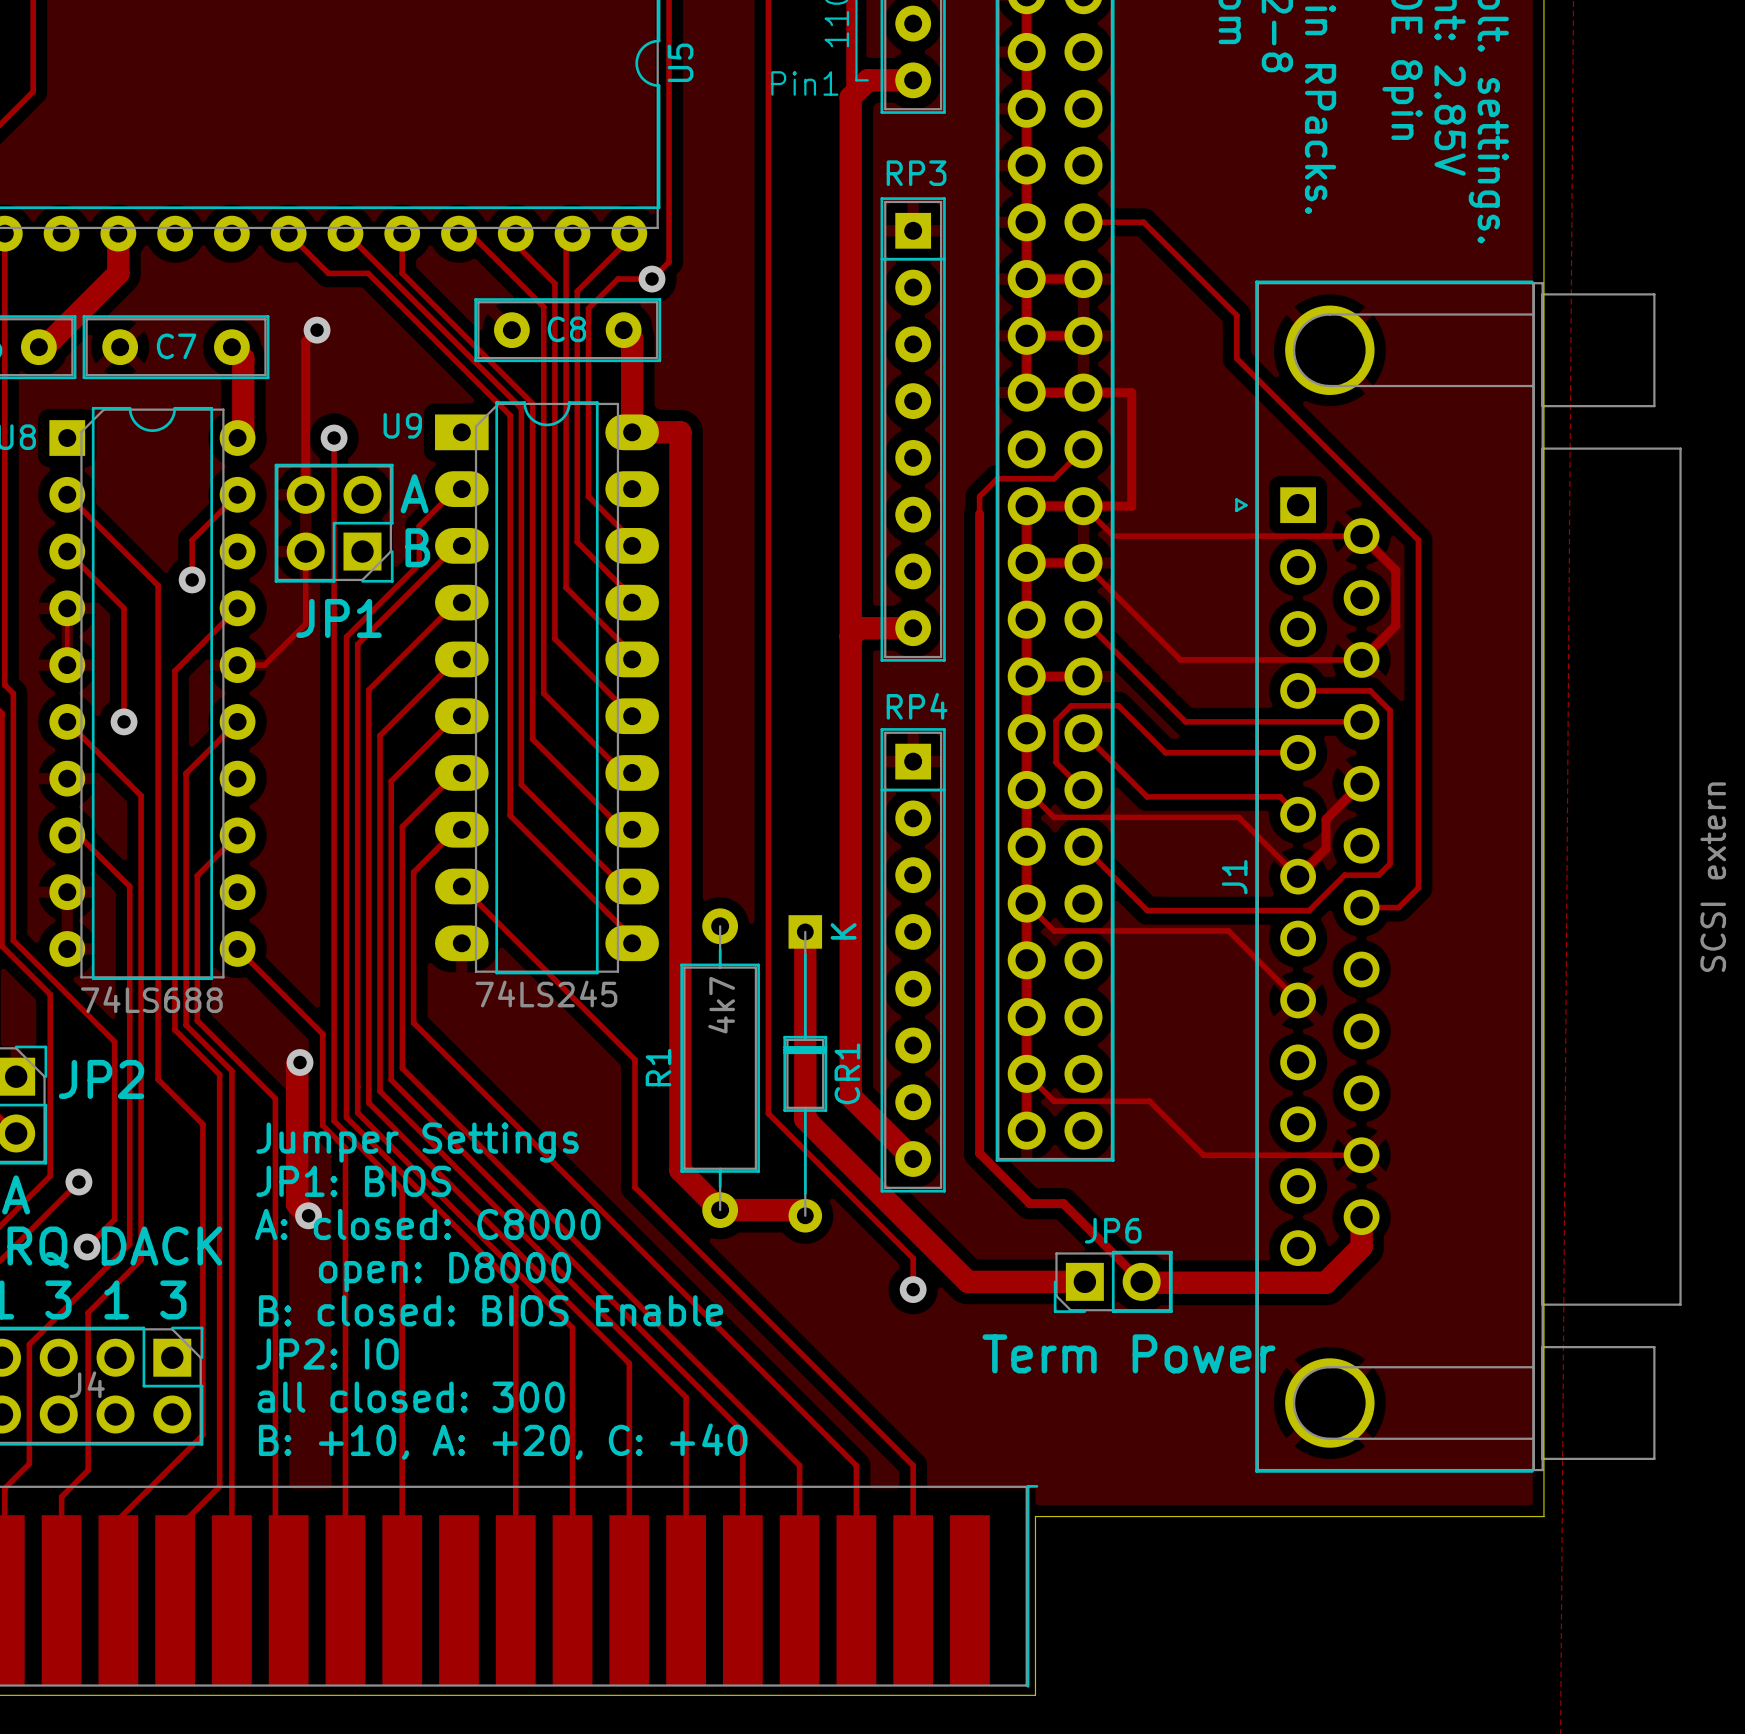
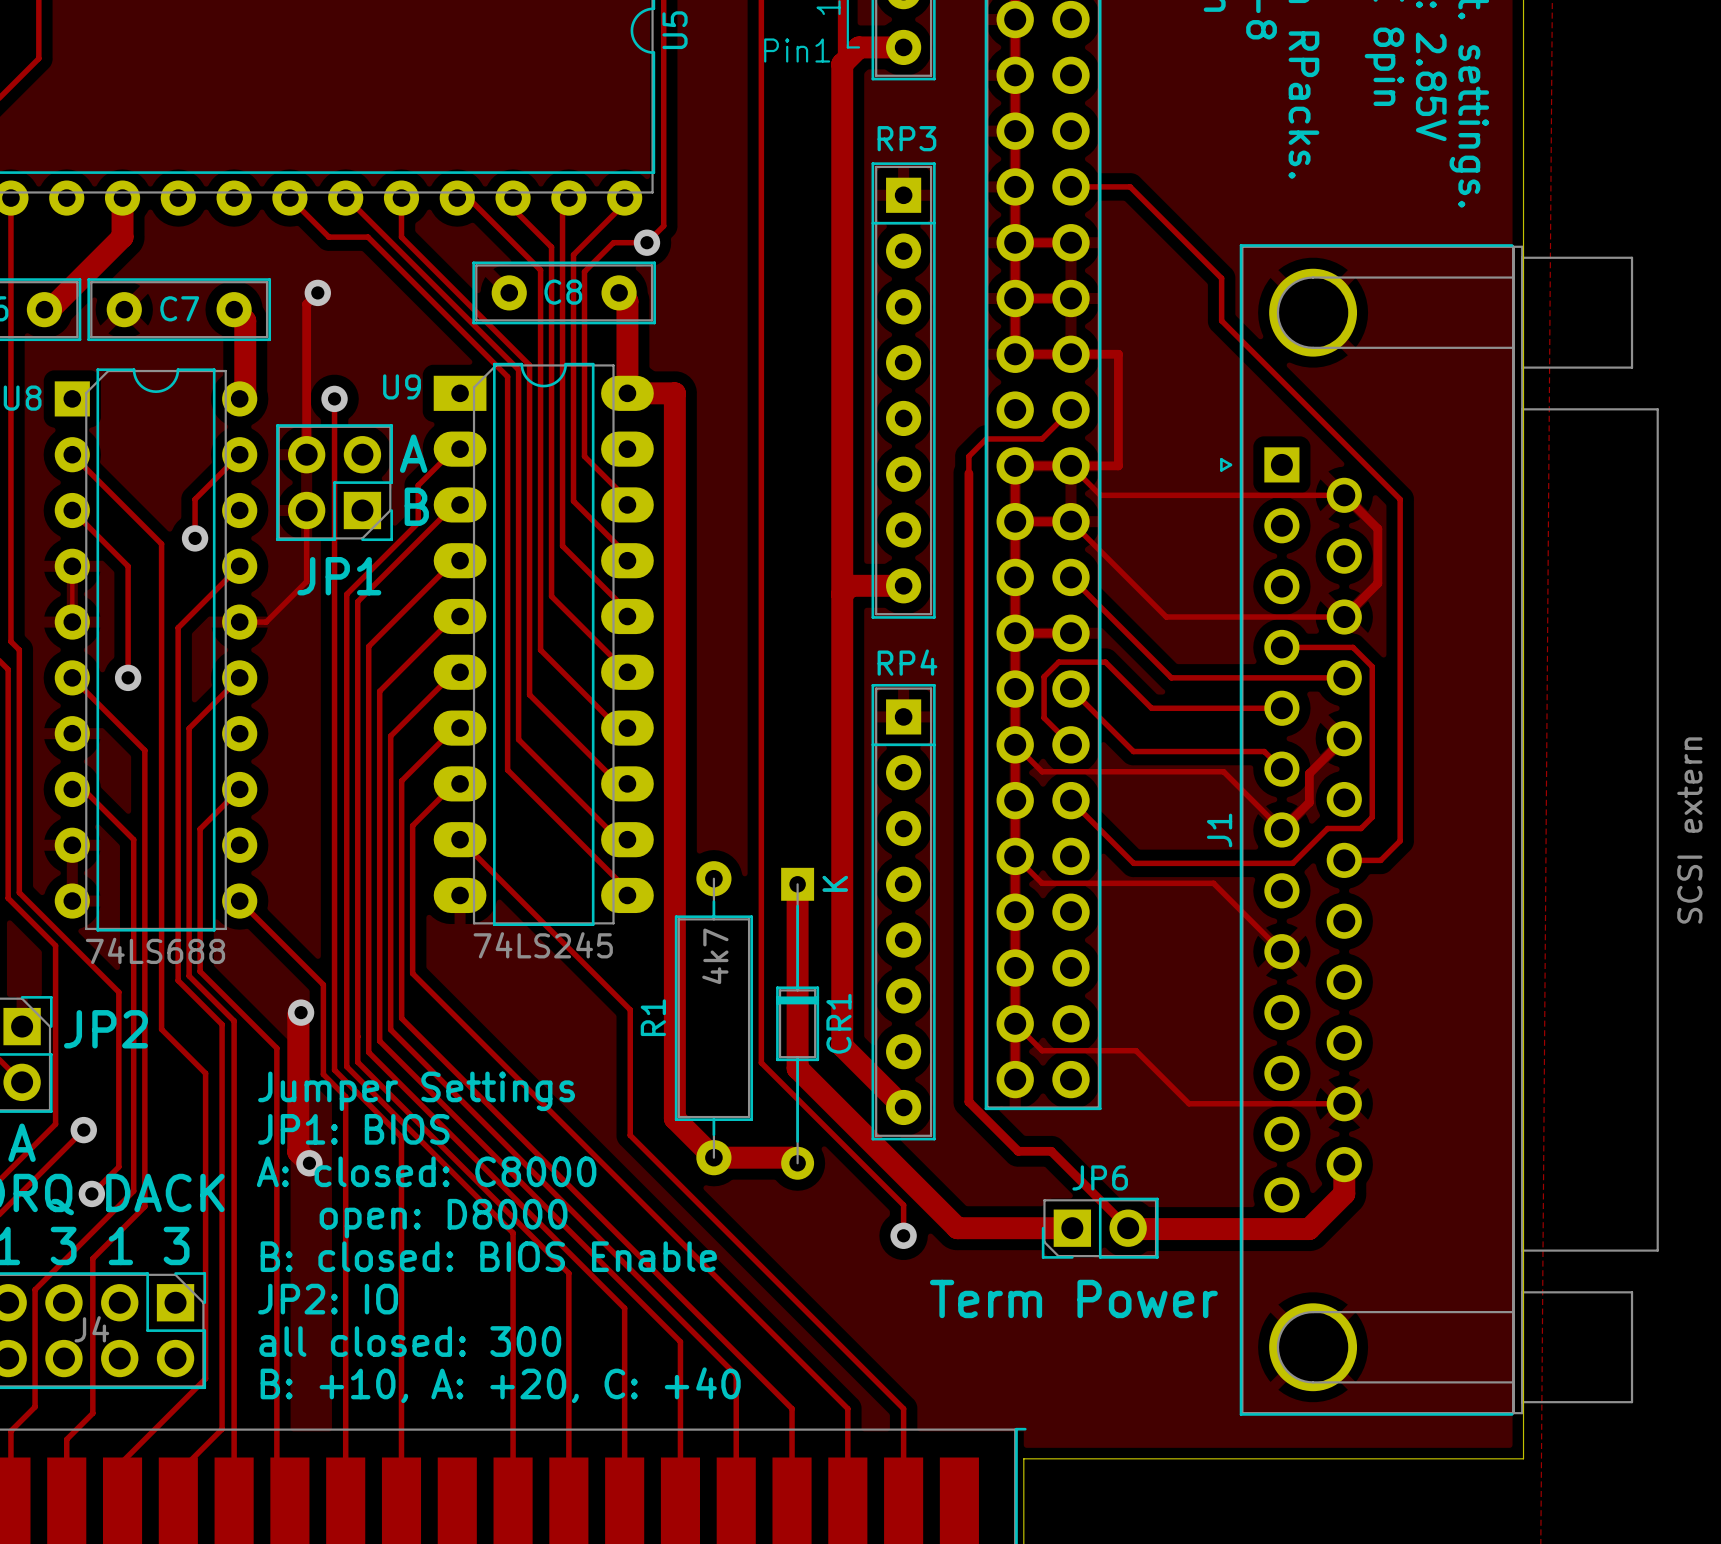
text position: Term Power (1129, 1353) -> Term Power (1073, 1298)

